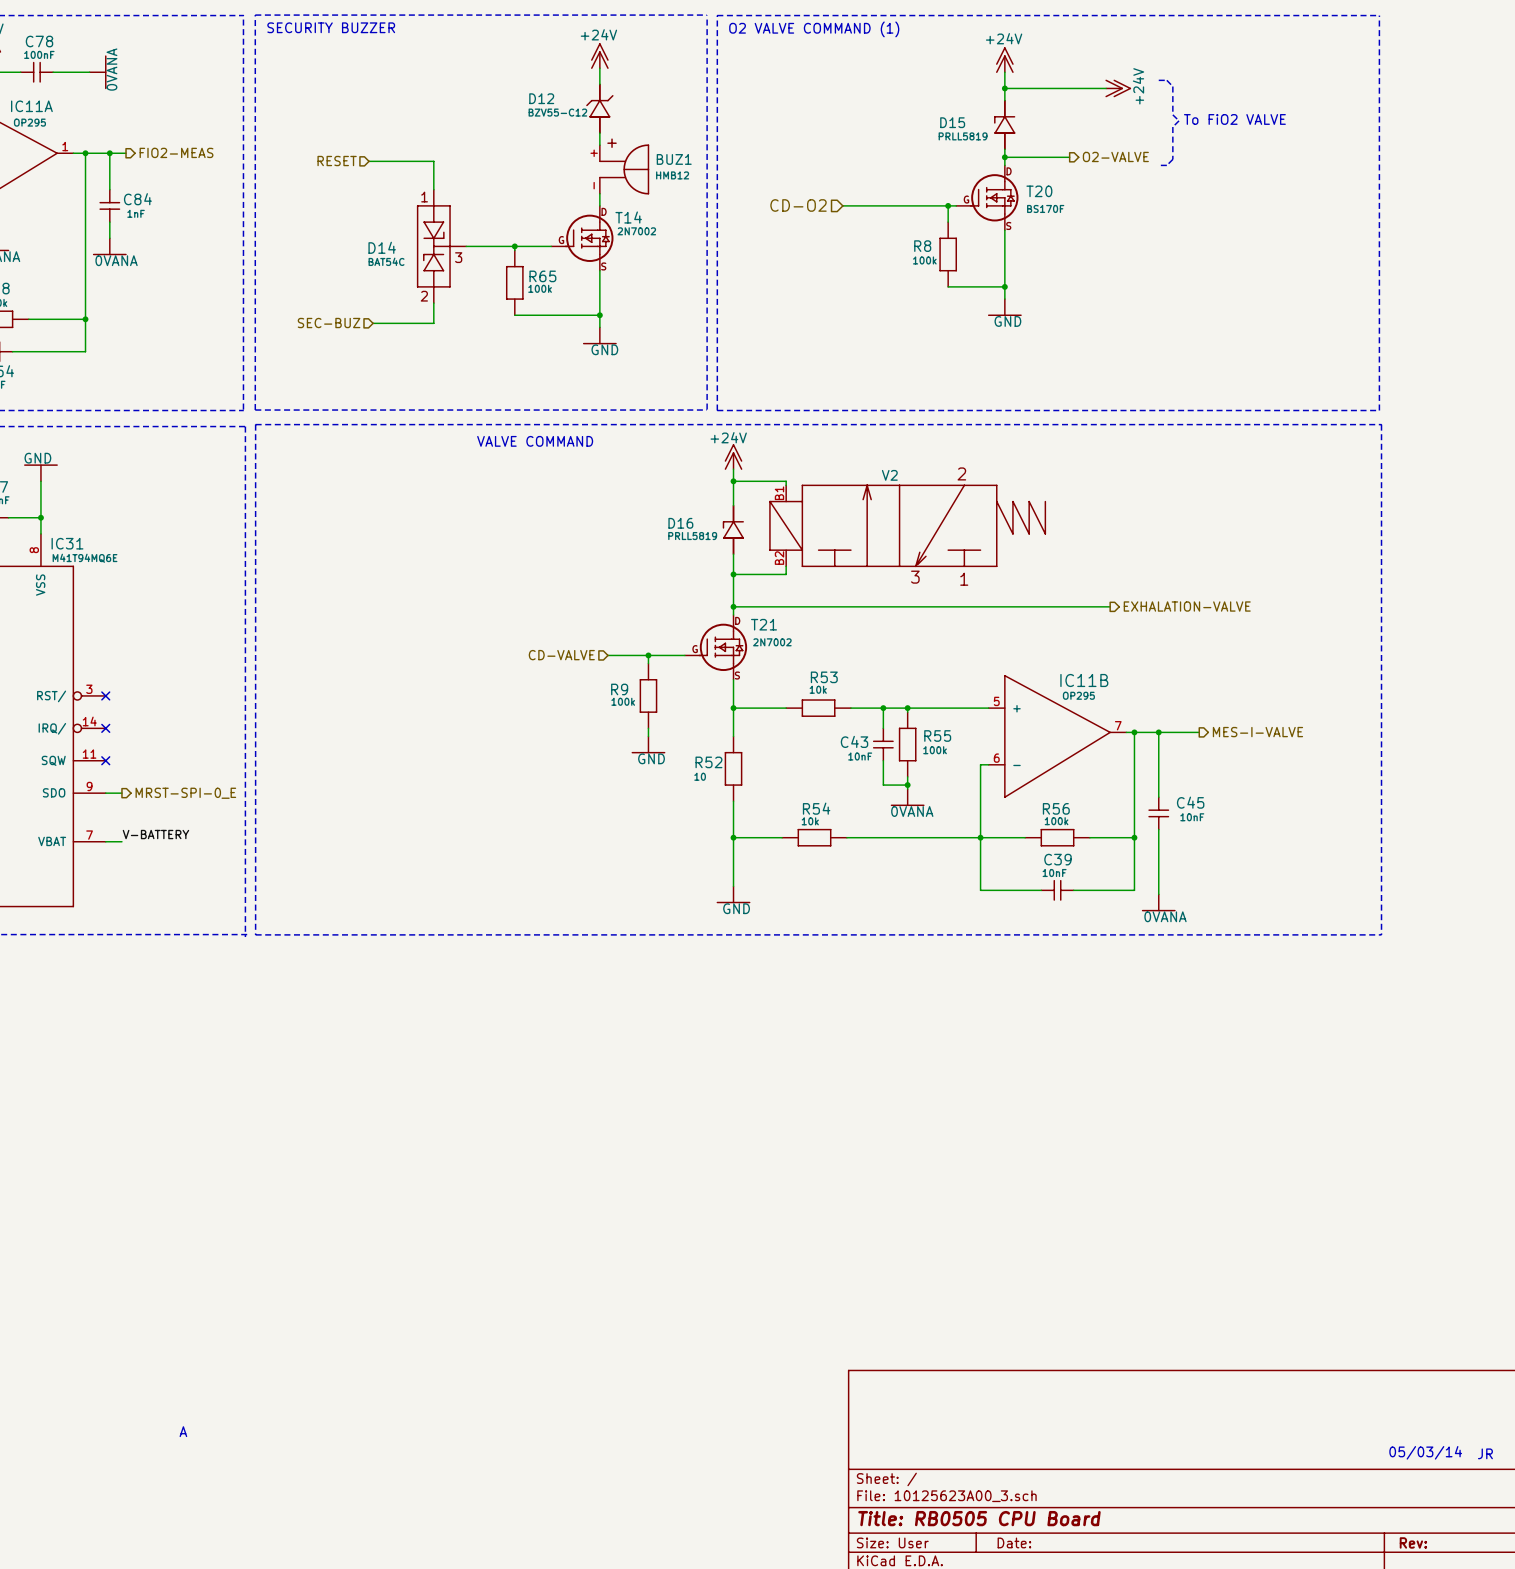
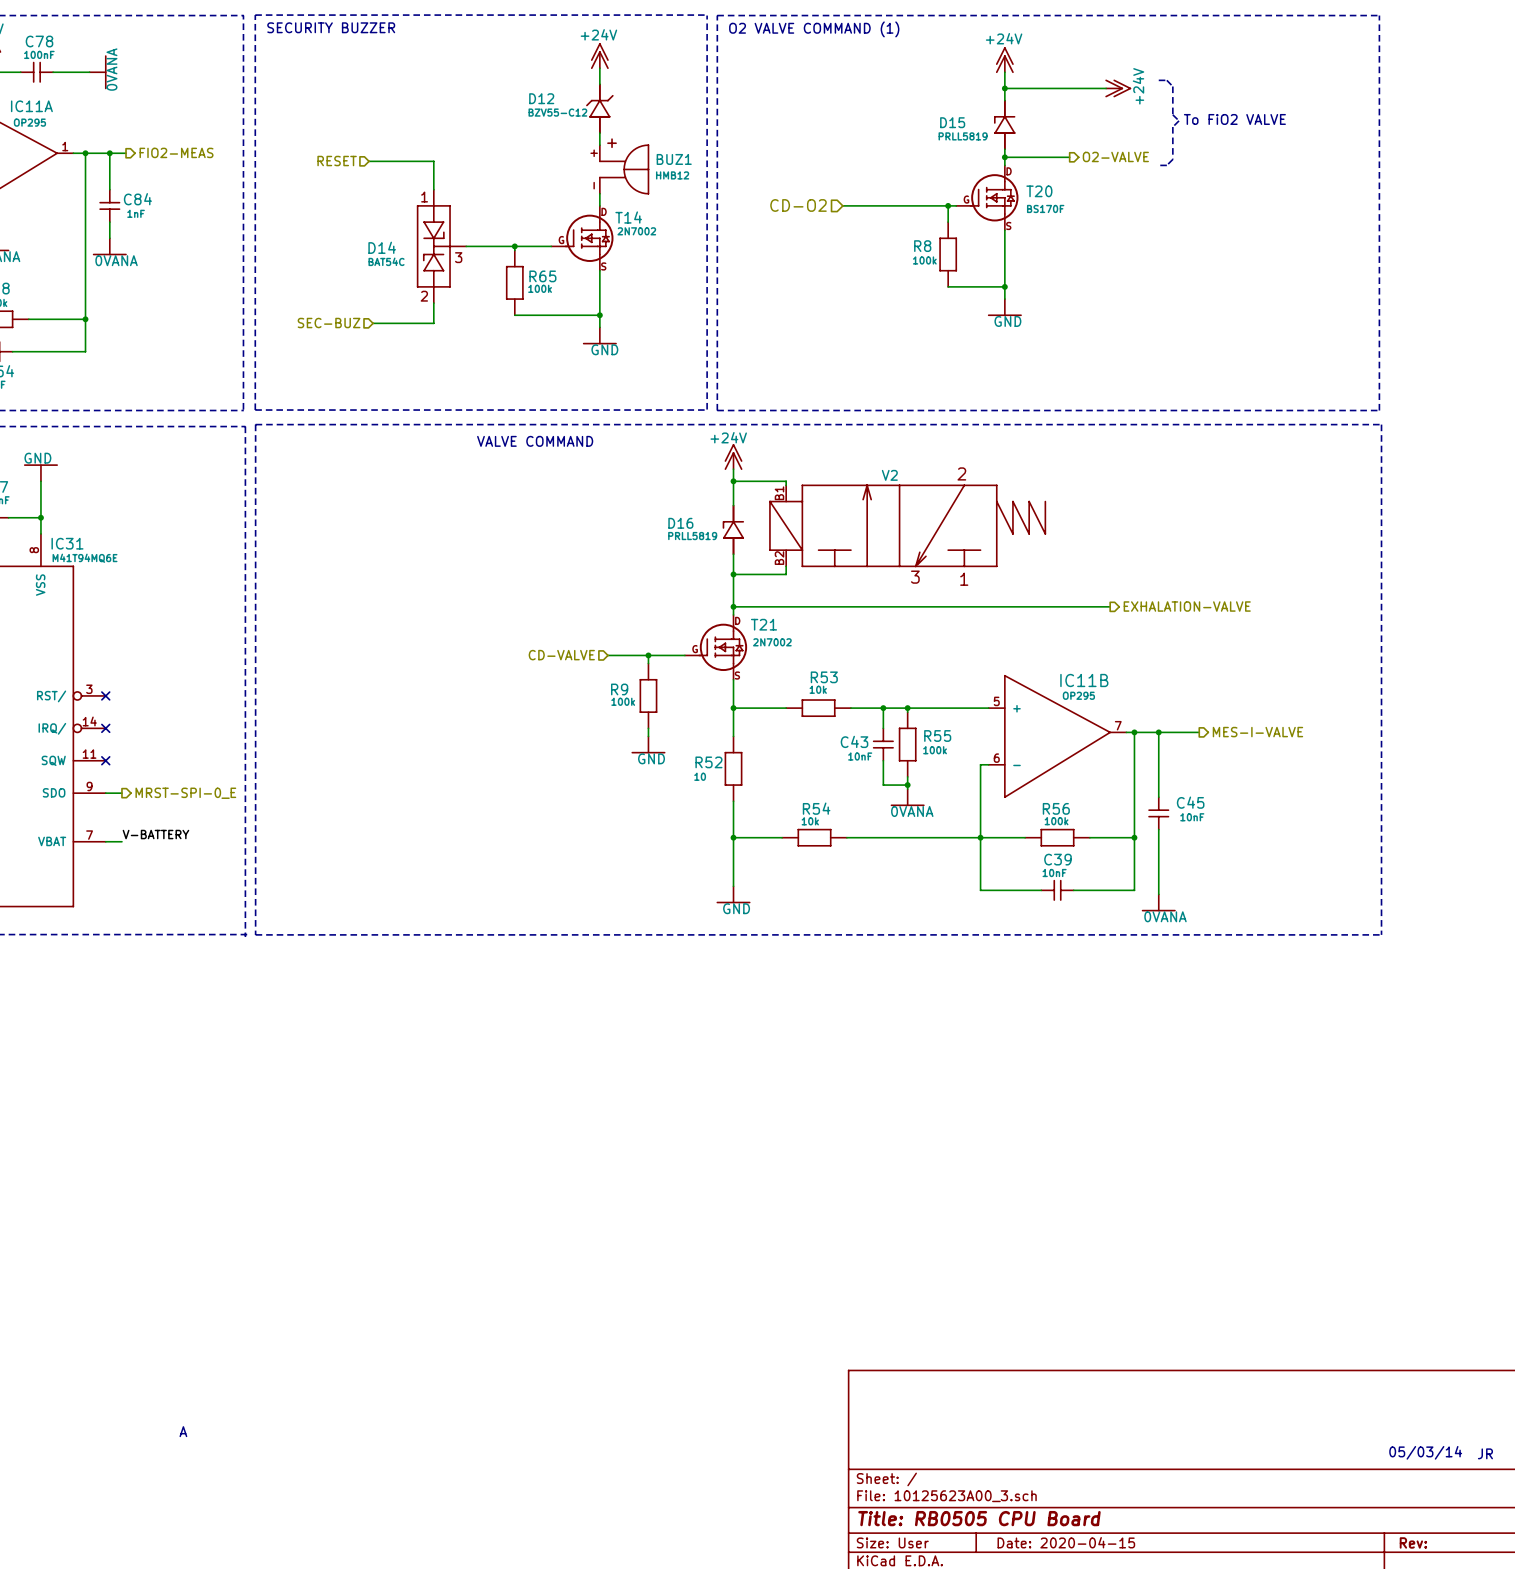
title block: Date: (1014, 1542) -> Date: 2020-04-15 (1066, 1542)

